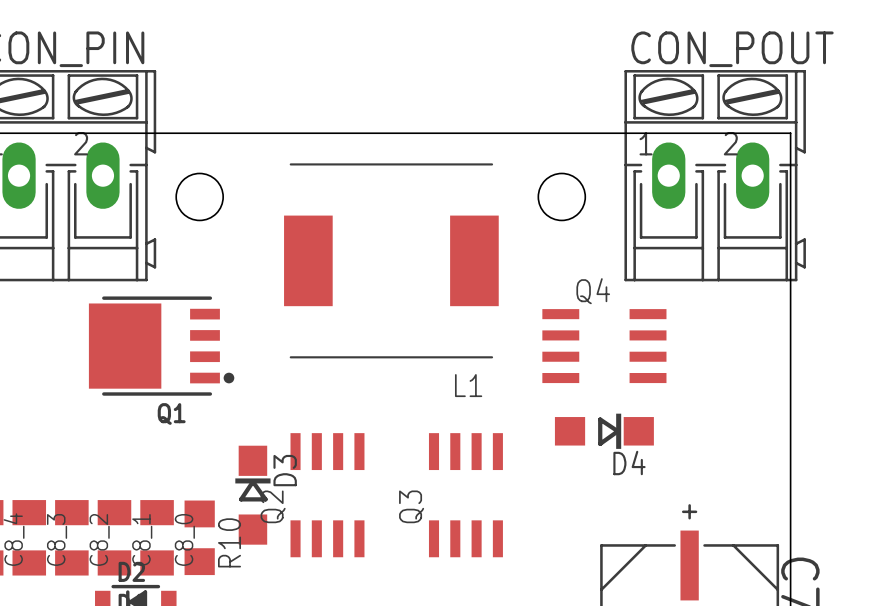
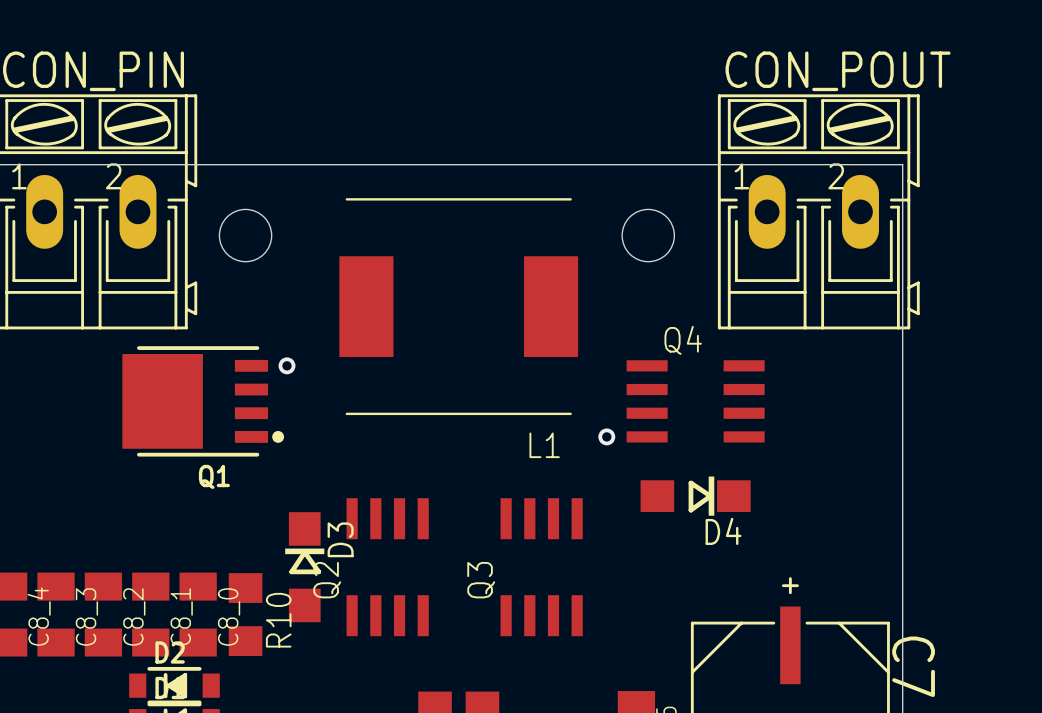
via: none -> (287, 365)
via: none -> (606, 436)

